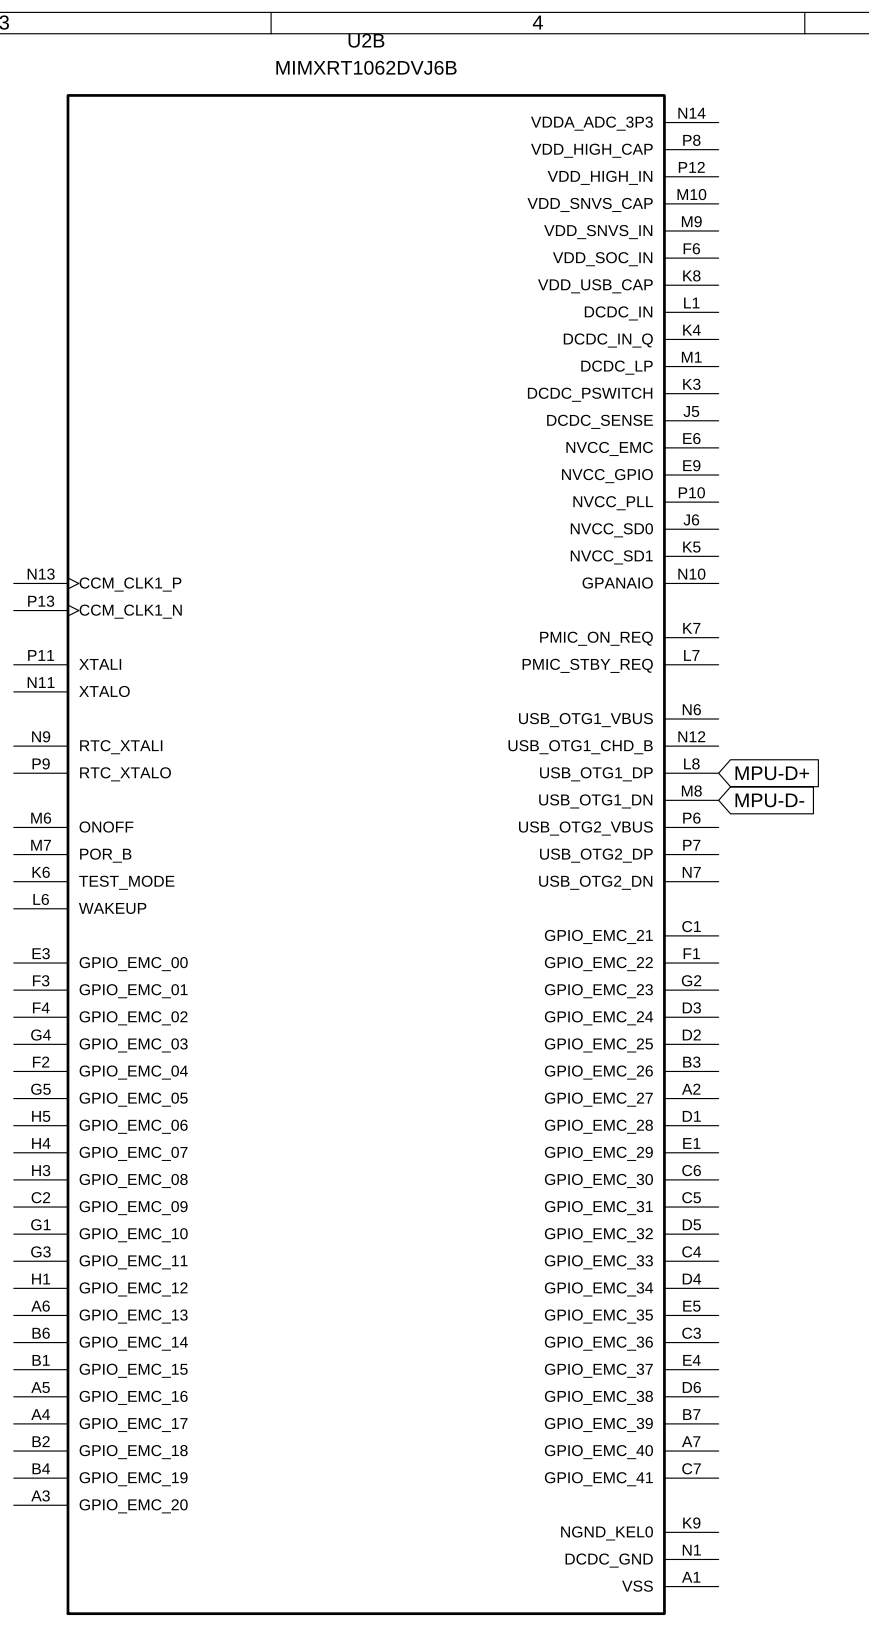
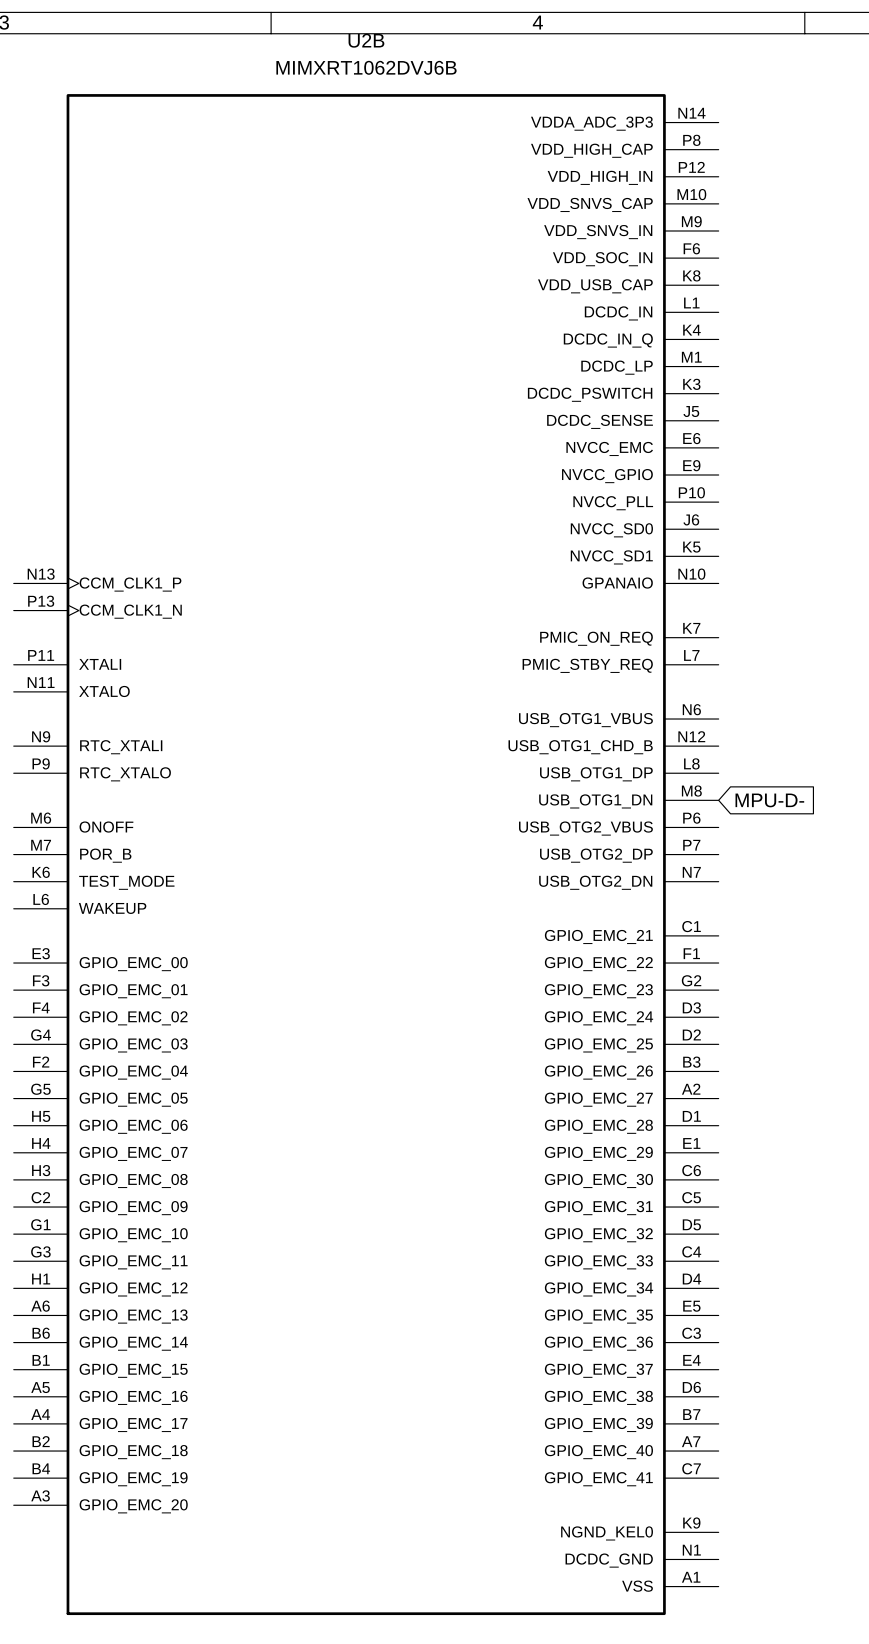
global label: MPU-D+ (772, 773) -> none

